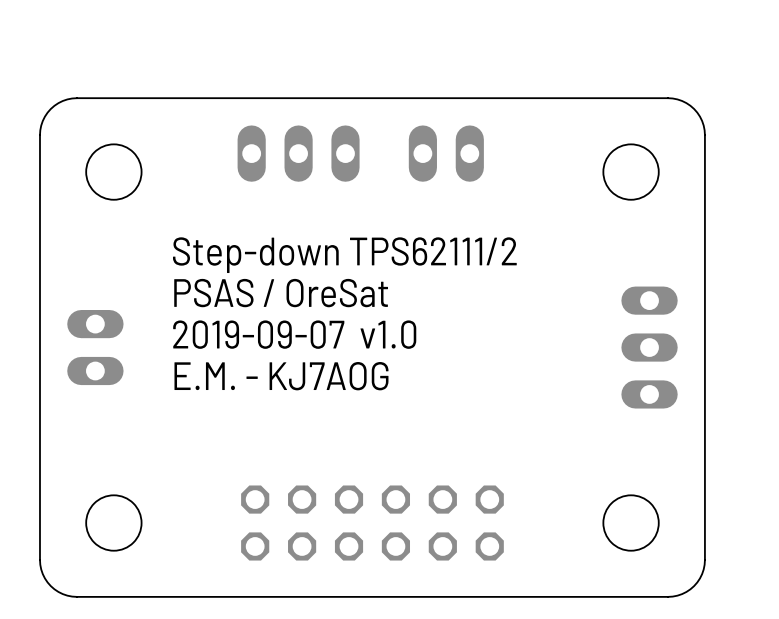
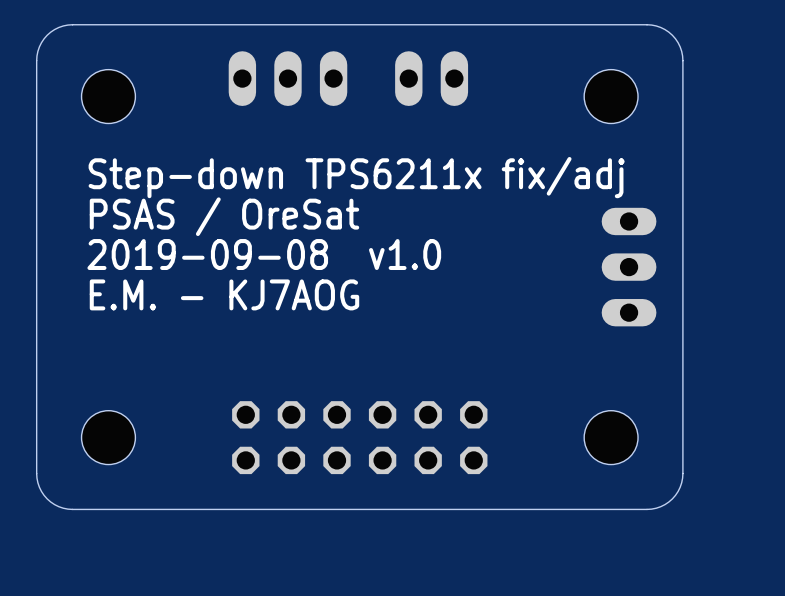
text: Step-down TPS62111/2 (344, 255) -> Step-down TPS6211x fix/adj (356, 177)
text position: PSAS / OreSat (281, 293) -> PSAS / OreSat (224, 216)
text: 2019-09-07 v1.0 (294, 334) -> 2019-09-08 v1.0 (264, 254)
part: (95, 347) -> none
text position: E.M. - KJ7AOG (281, 376) -> E.M. - KJ7AOG (224, 294)

